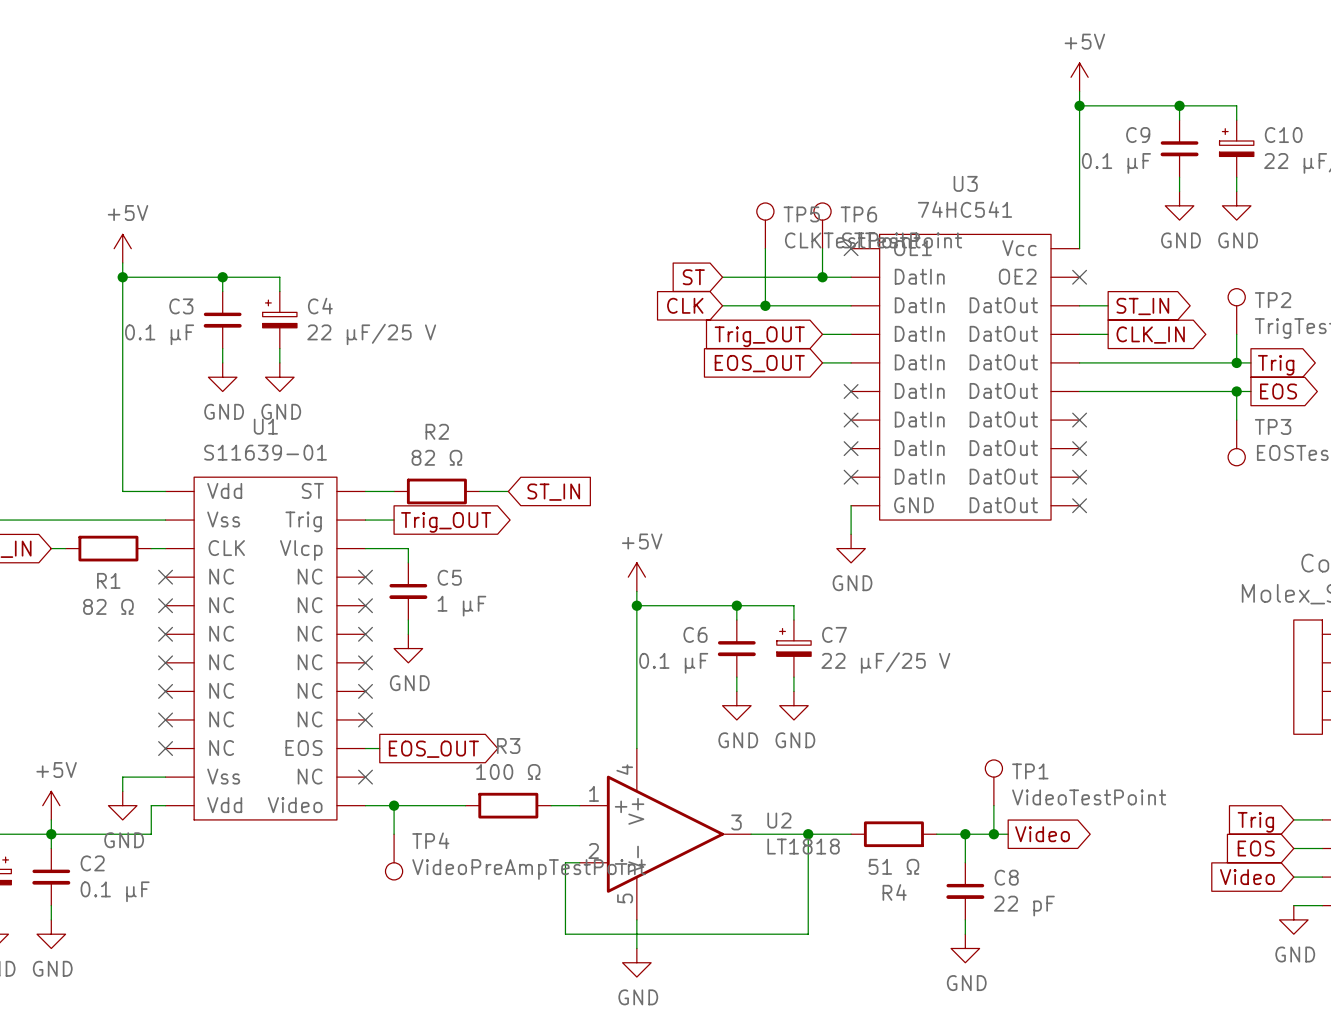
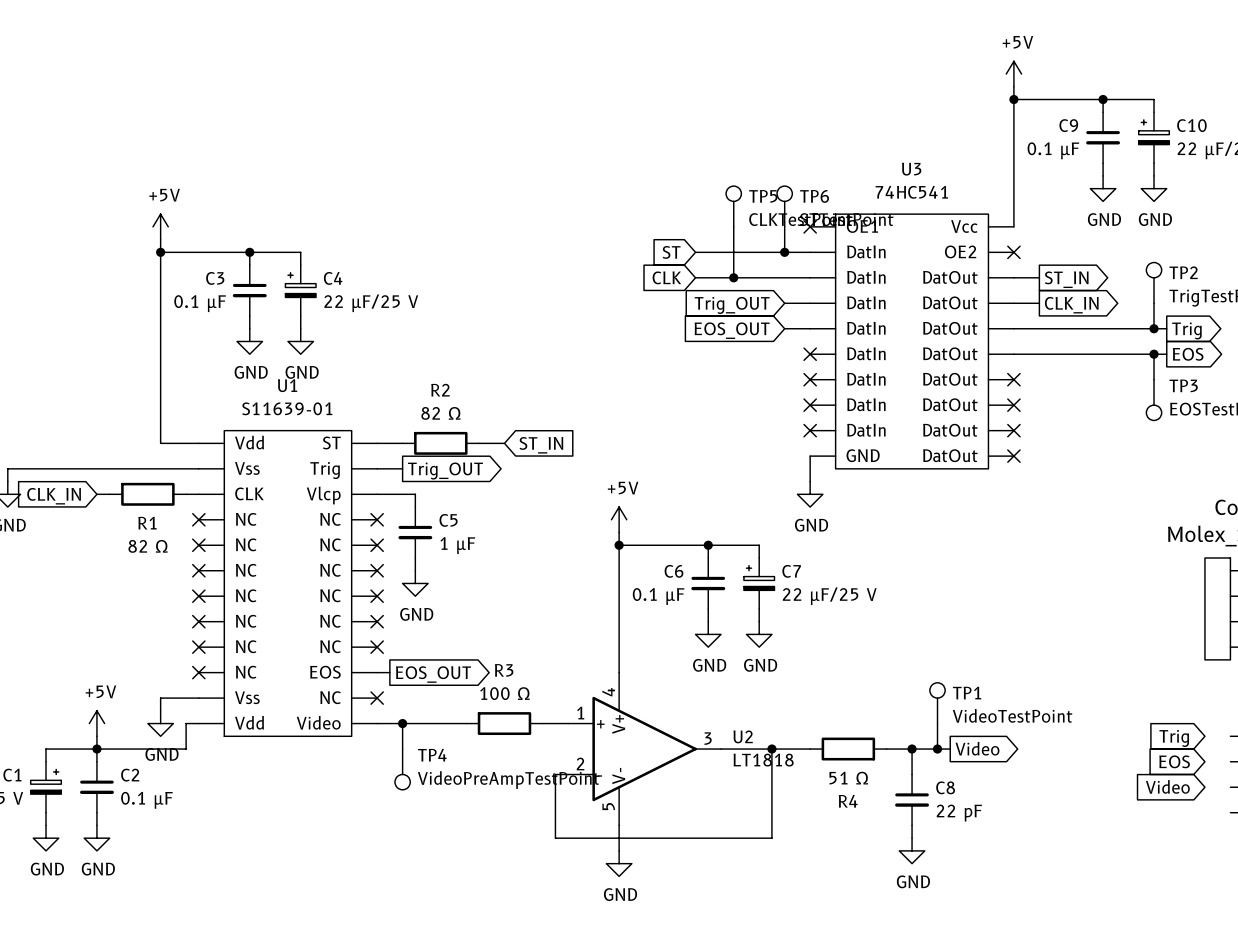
wire: (1293, 819) (1322, 819) -> none
wire: (1293, 848) (1322, 848) -> none
wire: (1293, 877) (1322, 877) -> none
wire: (1293, 905) (1322, 905) -> none
power symbol: GND (1293, 919) -> none

